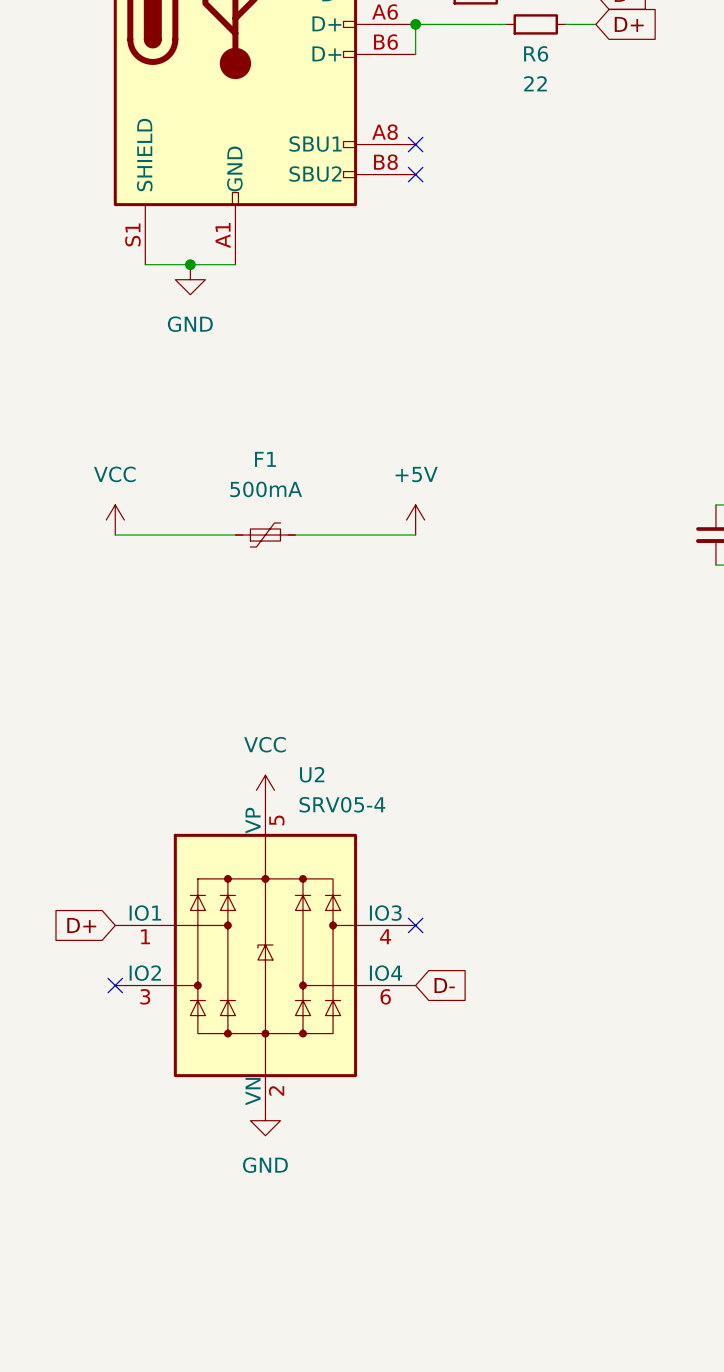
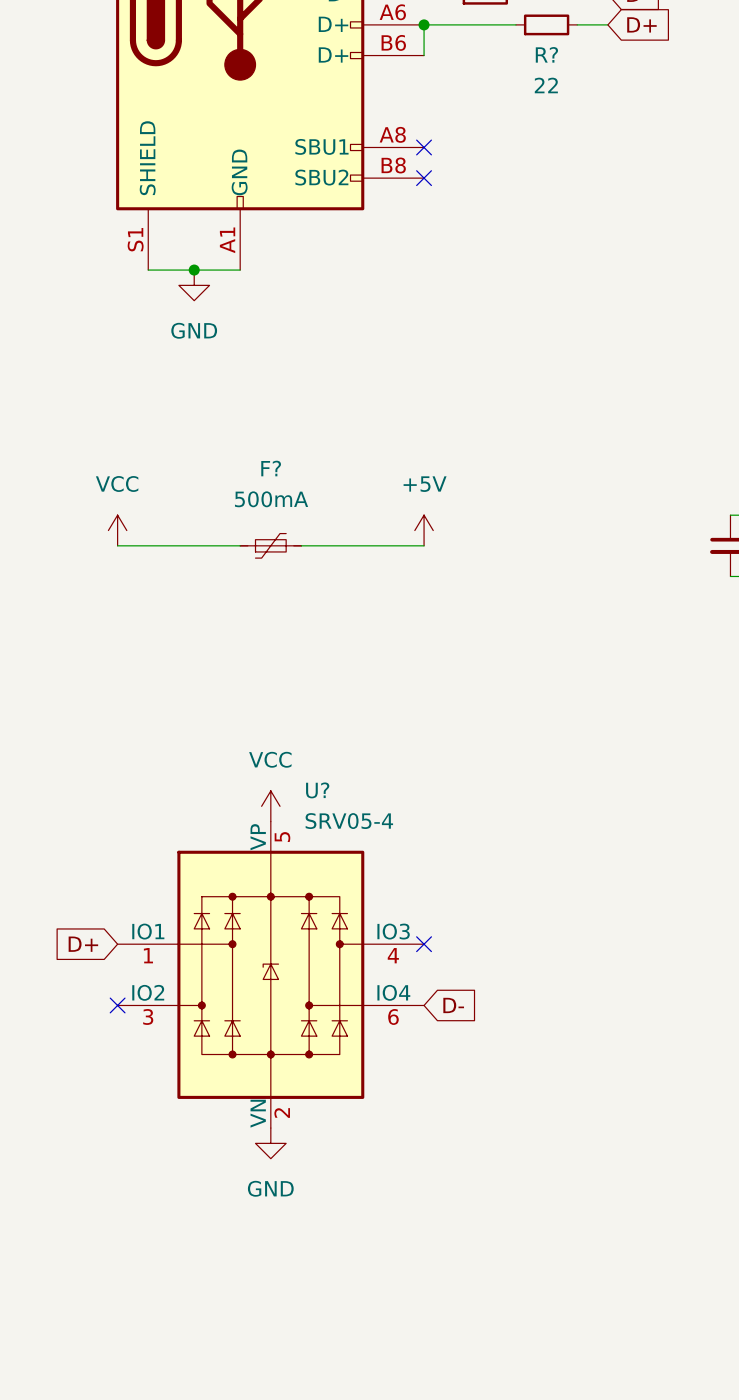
R6 name: R6 (536, 53) -> R? (546, 54)
F1 name: F1 (265, 459) -> F? (271, 468)
U2 name: U2 (312, 774) -> U? (317, 790)

